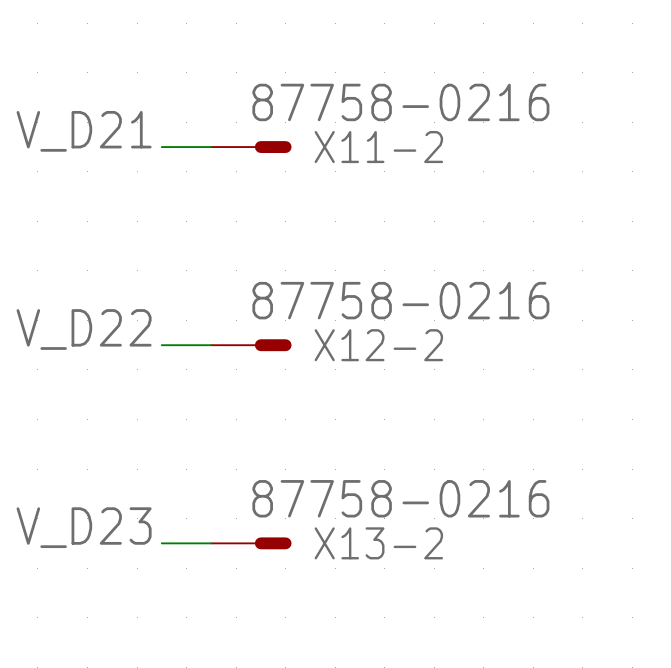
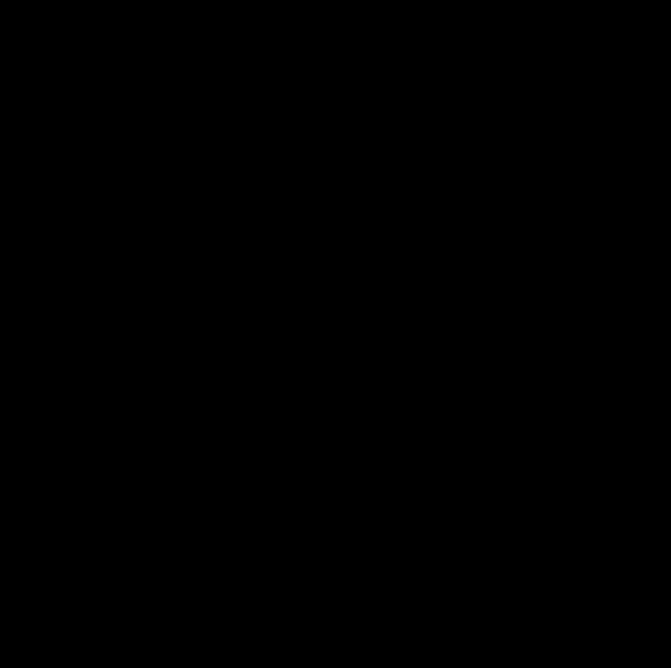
label: V_D21 (84, 131) -> none
wire: (161, 147) (211, 147) -> none
X11-2: 87758-0216 (251, 147) -> none
label: V_D22 (84, 329) -> none
wire: (161, 345) (211, 345) -> none
X12-2: 87758-0216 (251, 345) -> none
label: V_D23 (84, 527) -> none
wire: (161, 543) (211, 543) -> none
X13-2: 87758-0216 (251, 543) -> none

